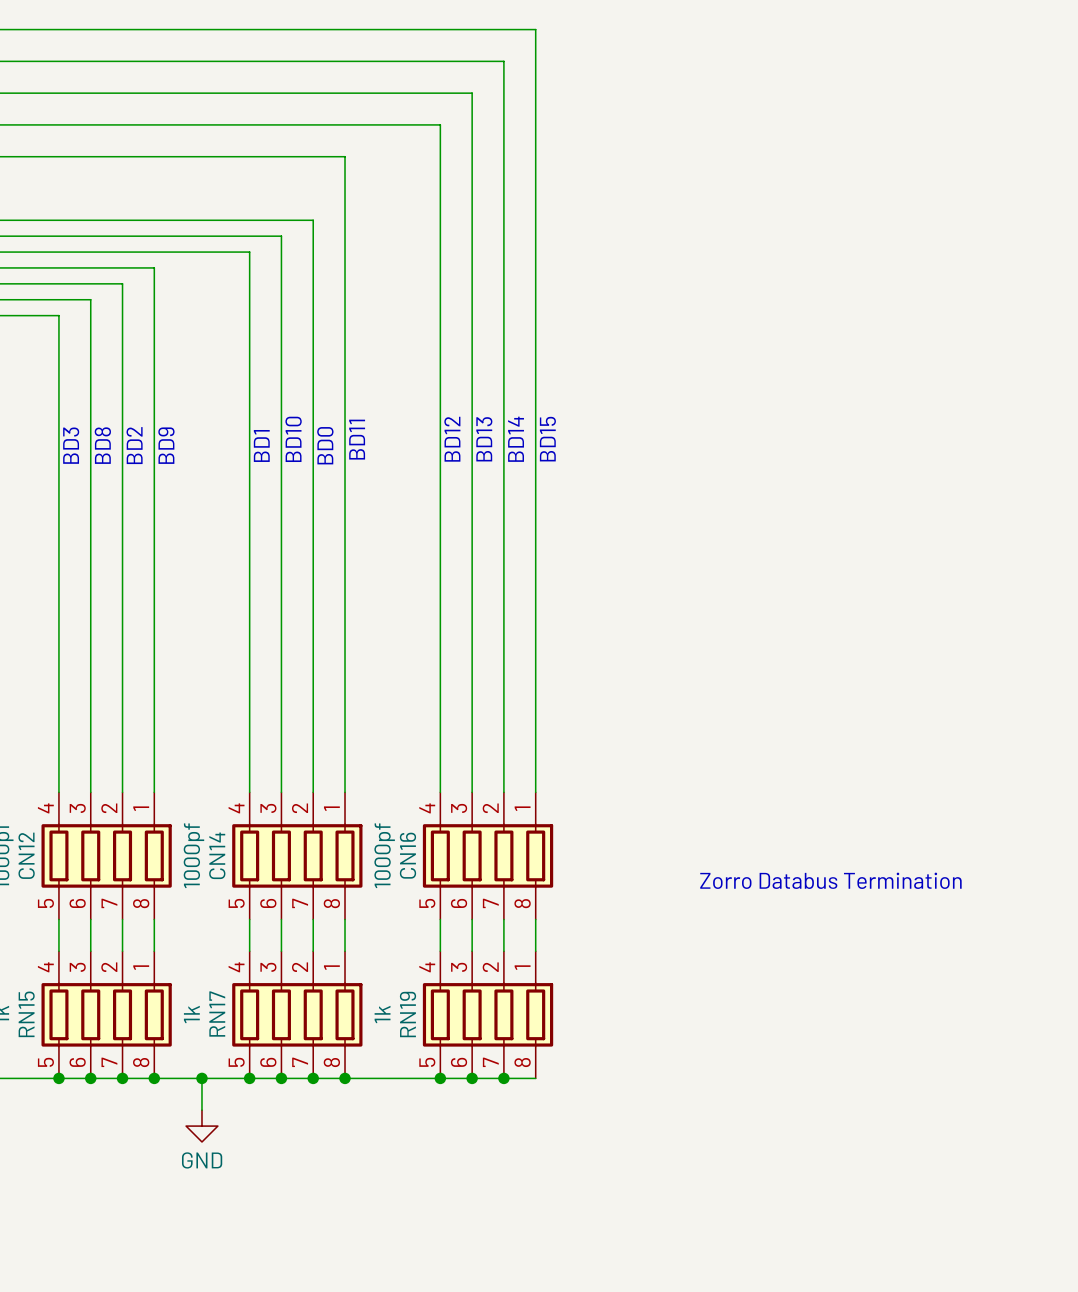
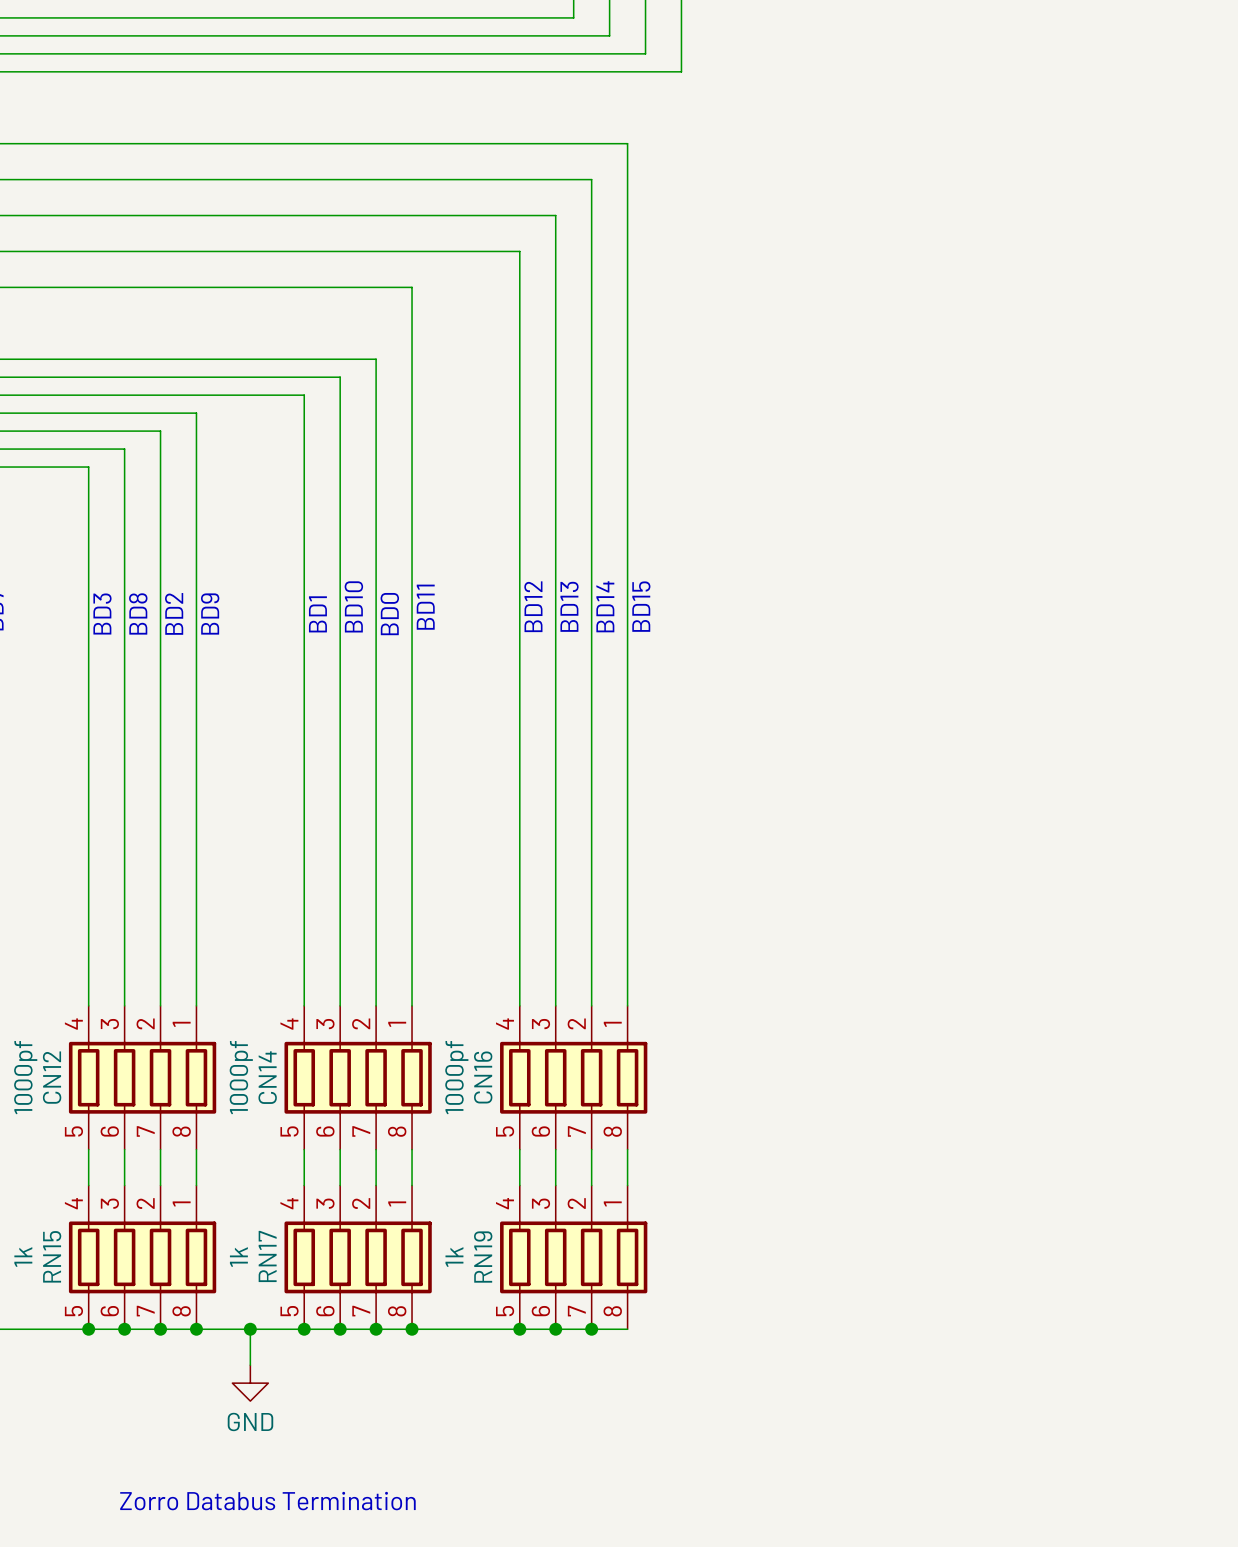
text: Zorro Databus Termination (830, 880) -> none
text: none -> Zorro Databus Termination (267, 1501)

